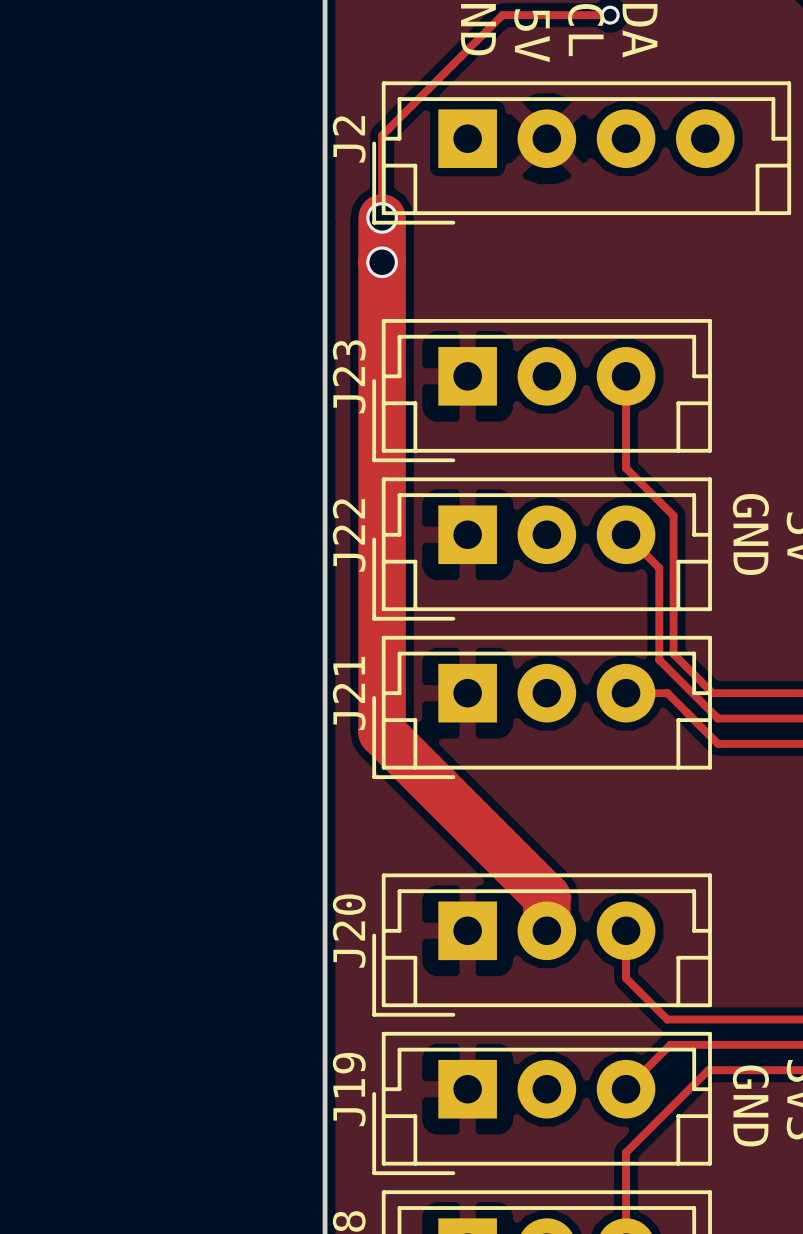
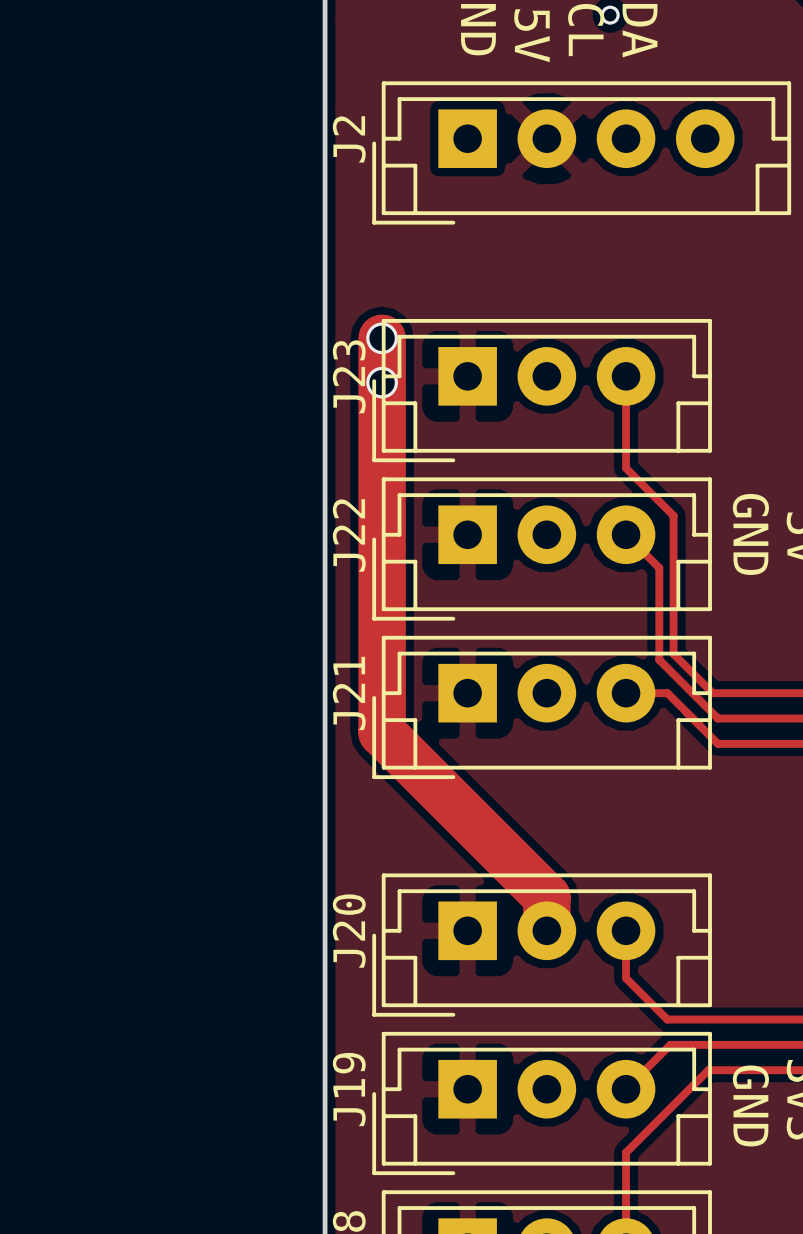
track: (610, 15) (502, 15) (382, 135) (382, 338) -> none
via: (382, 217) -> none
via: (382, 262) -> none
via: none -> (382, 338)
via: none -> (382, 382)

